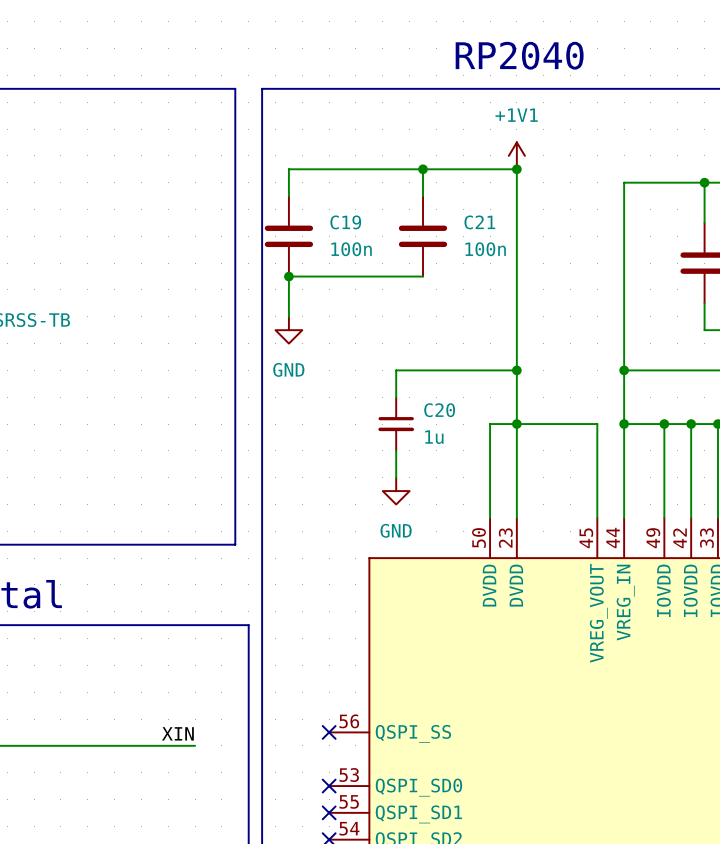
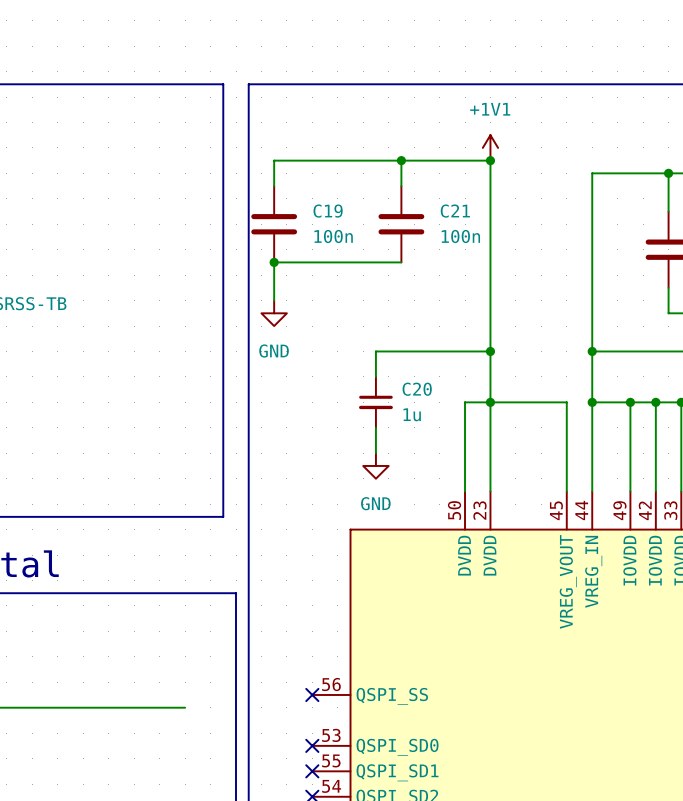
text: RP2040 (519, 55) -> none
label: XIN (177, 733) -> none

